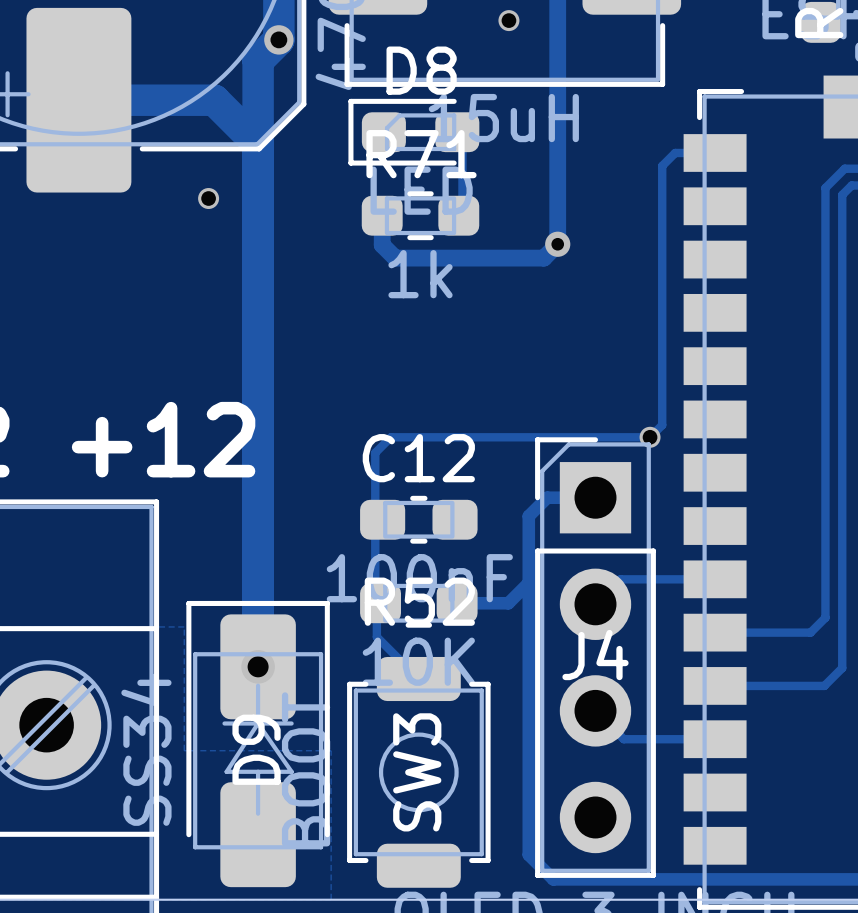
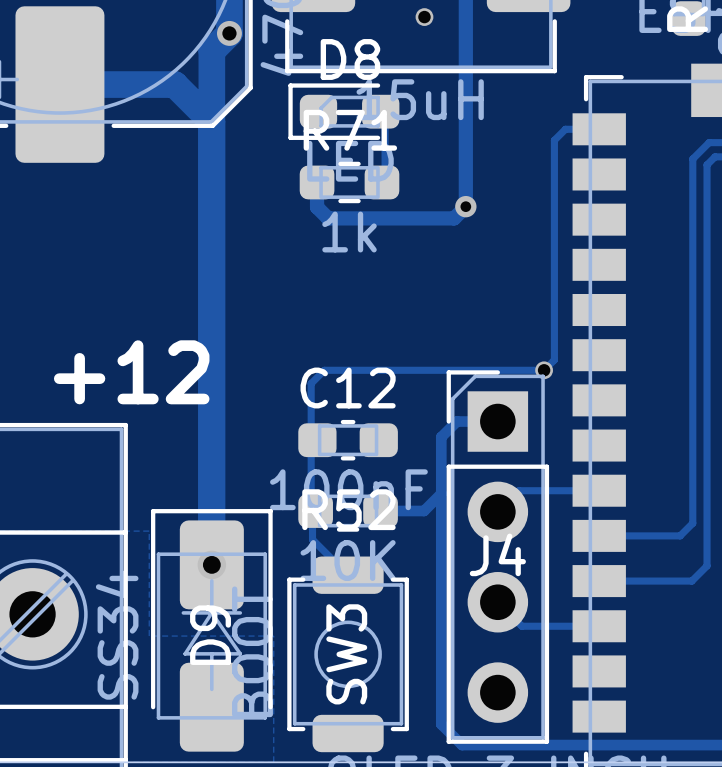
via: (208, 198) -> none

